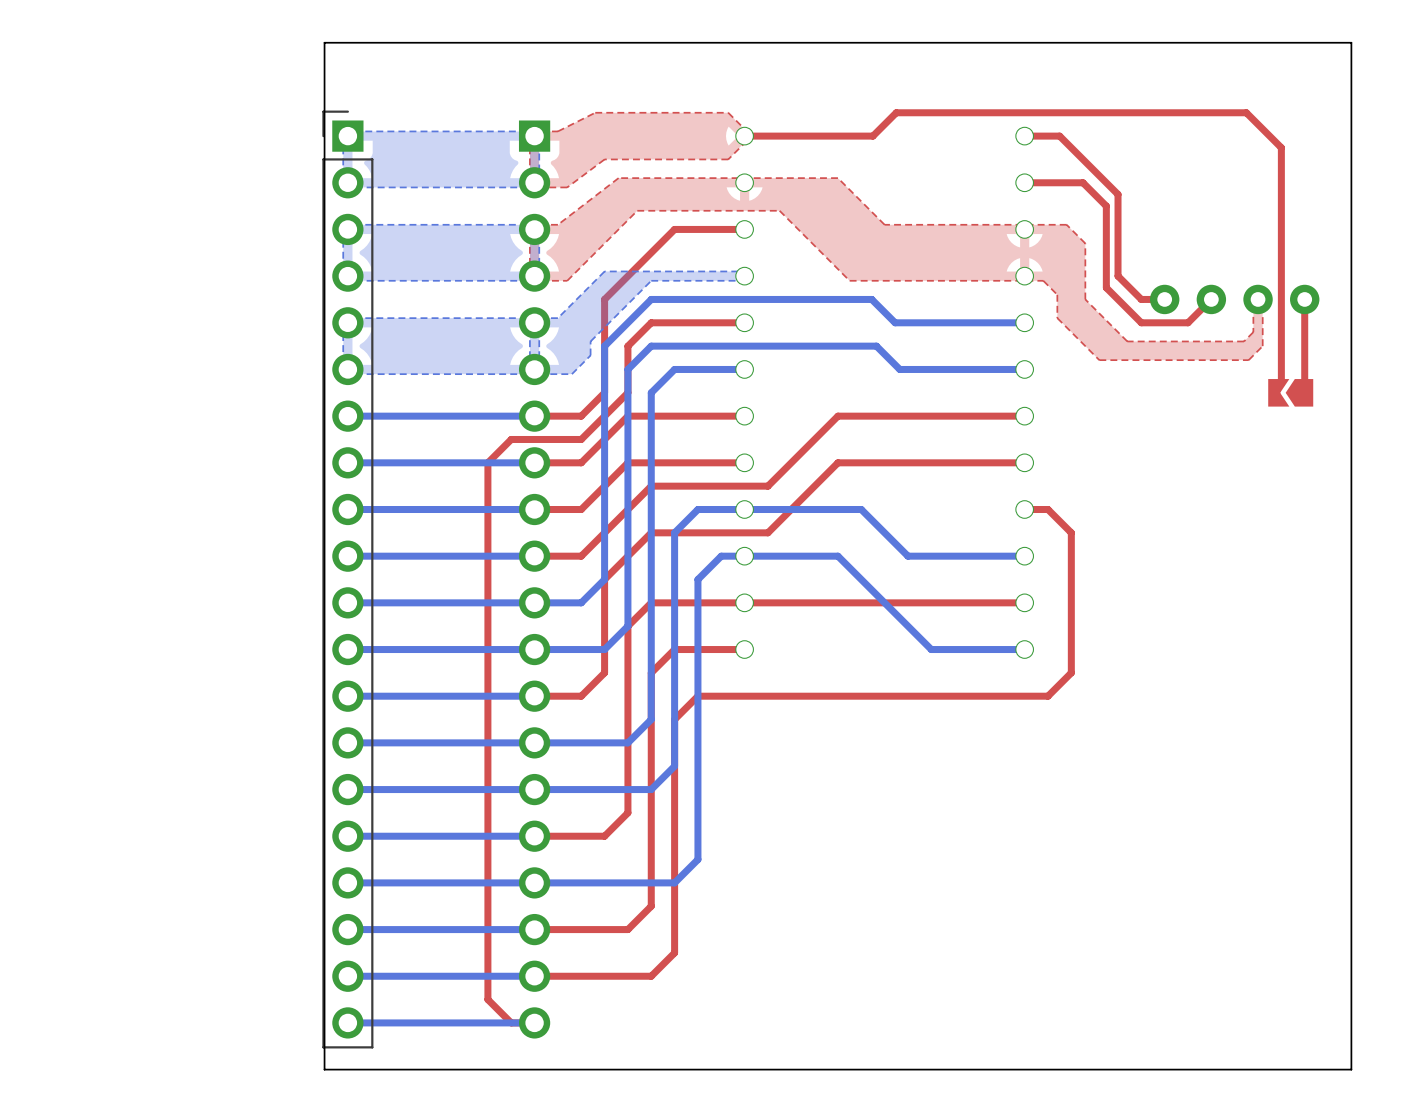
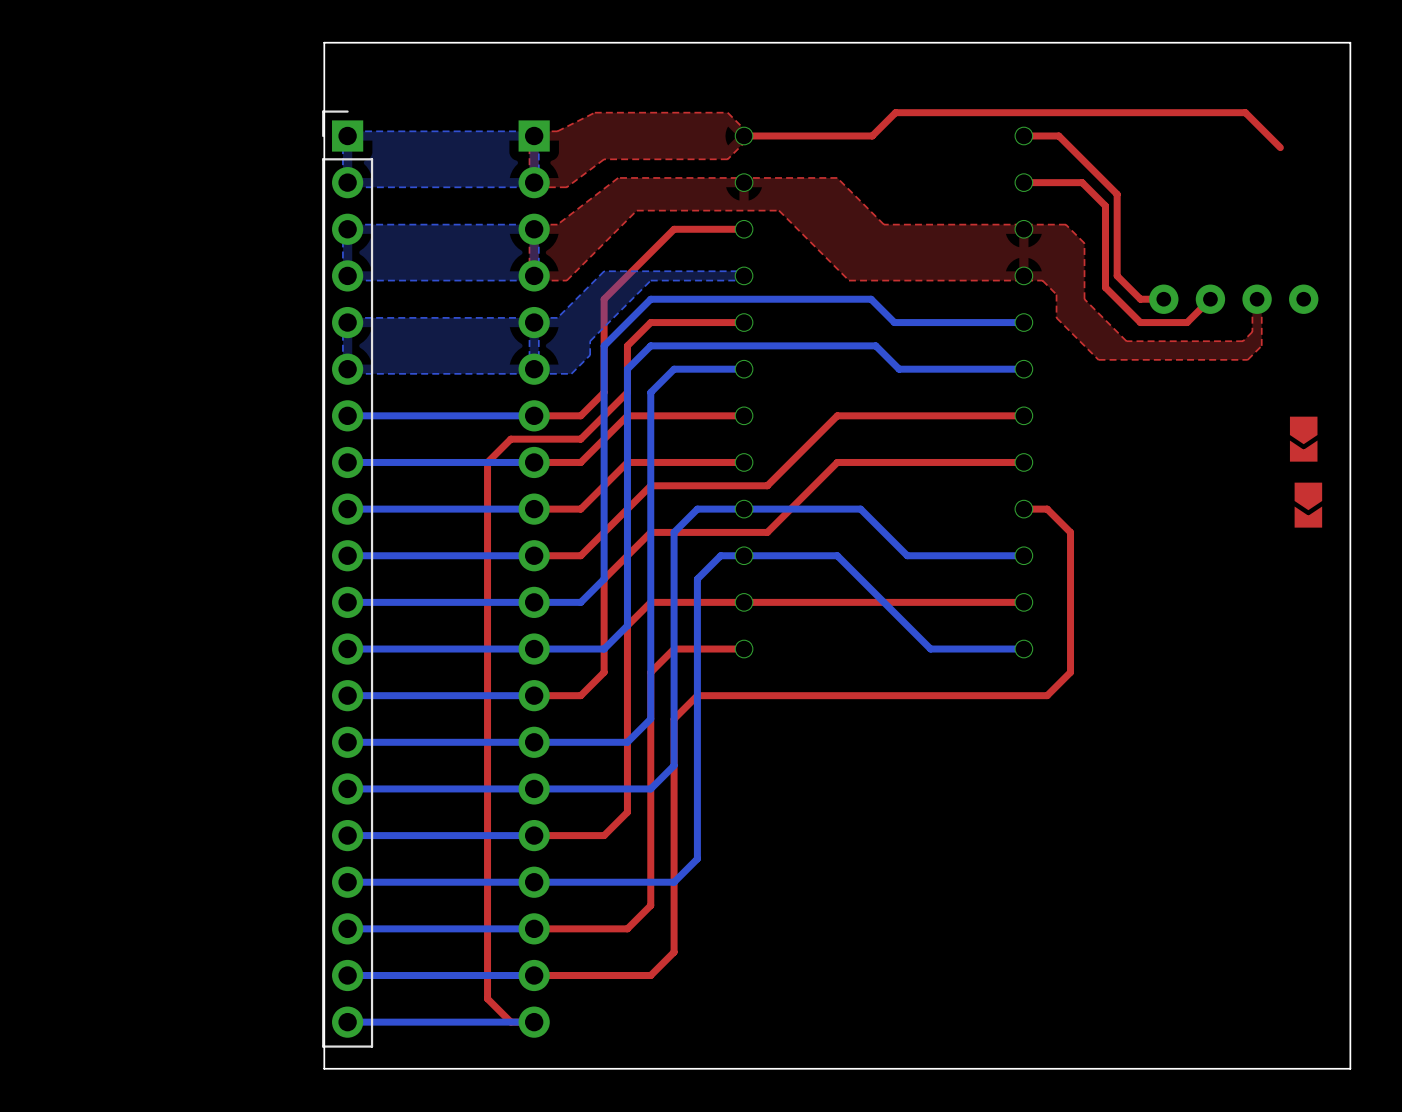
top track: (1281, 147) (1281, 383) (1276, 388) -> none
top track: (1304, 299) (1304, 392) -> none
part rotation: 0° (1290, 392) -> 90° counterclockwise (1303, 439)
part position: (1290, 392) -> (1303, 439)
part: none -> (1308, 505)

